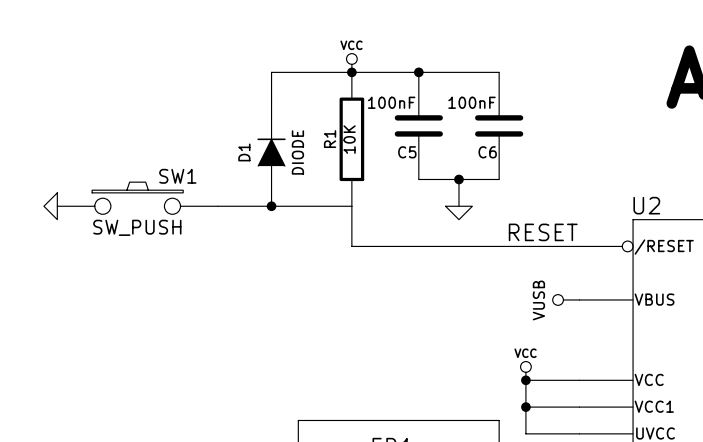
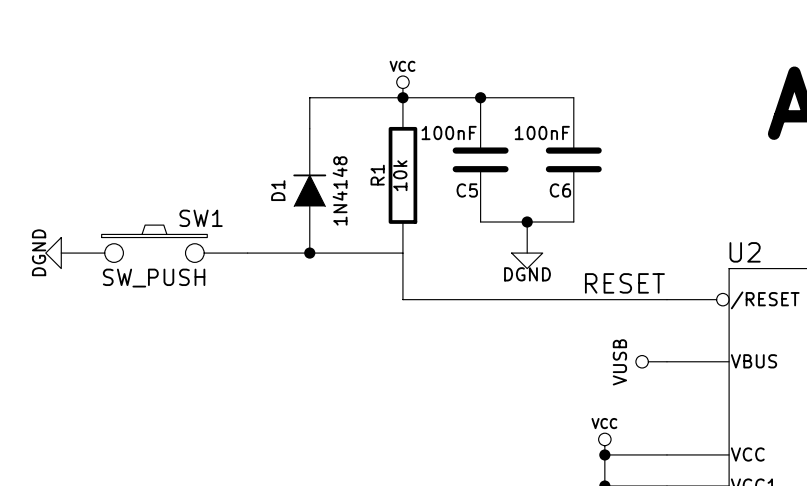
R1 value: 10K (349, 139) -> 10k (400, 175)
D1 value: DIODE (297, 152) -> 1N4148 (340, 190)
power symbol text: none -> DGND (39, 252)
power symbol text: none -> DGND (527, 274)

